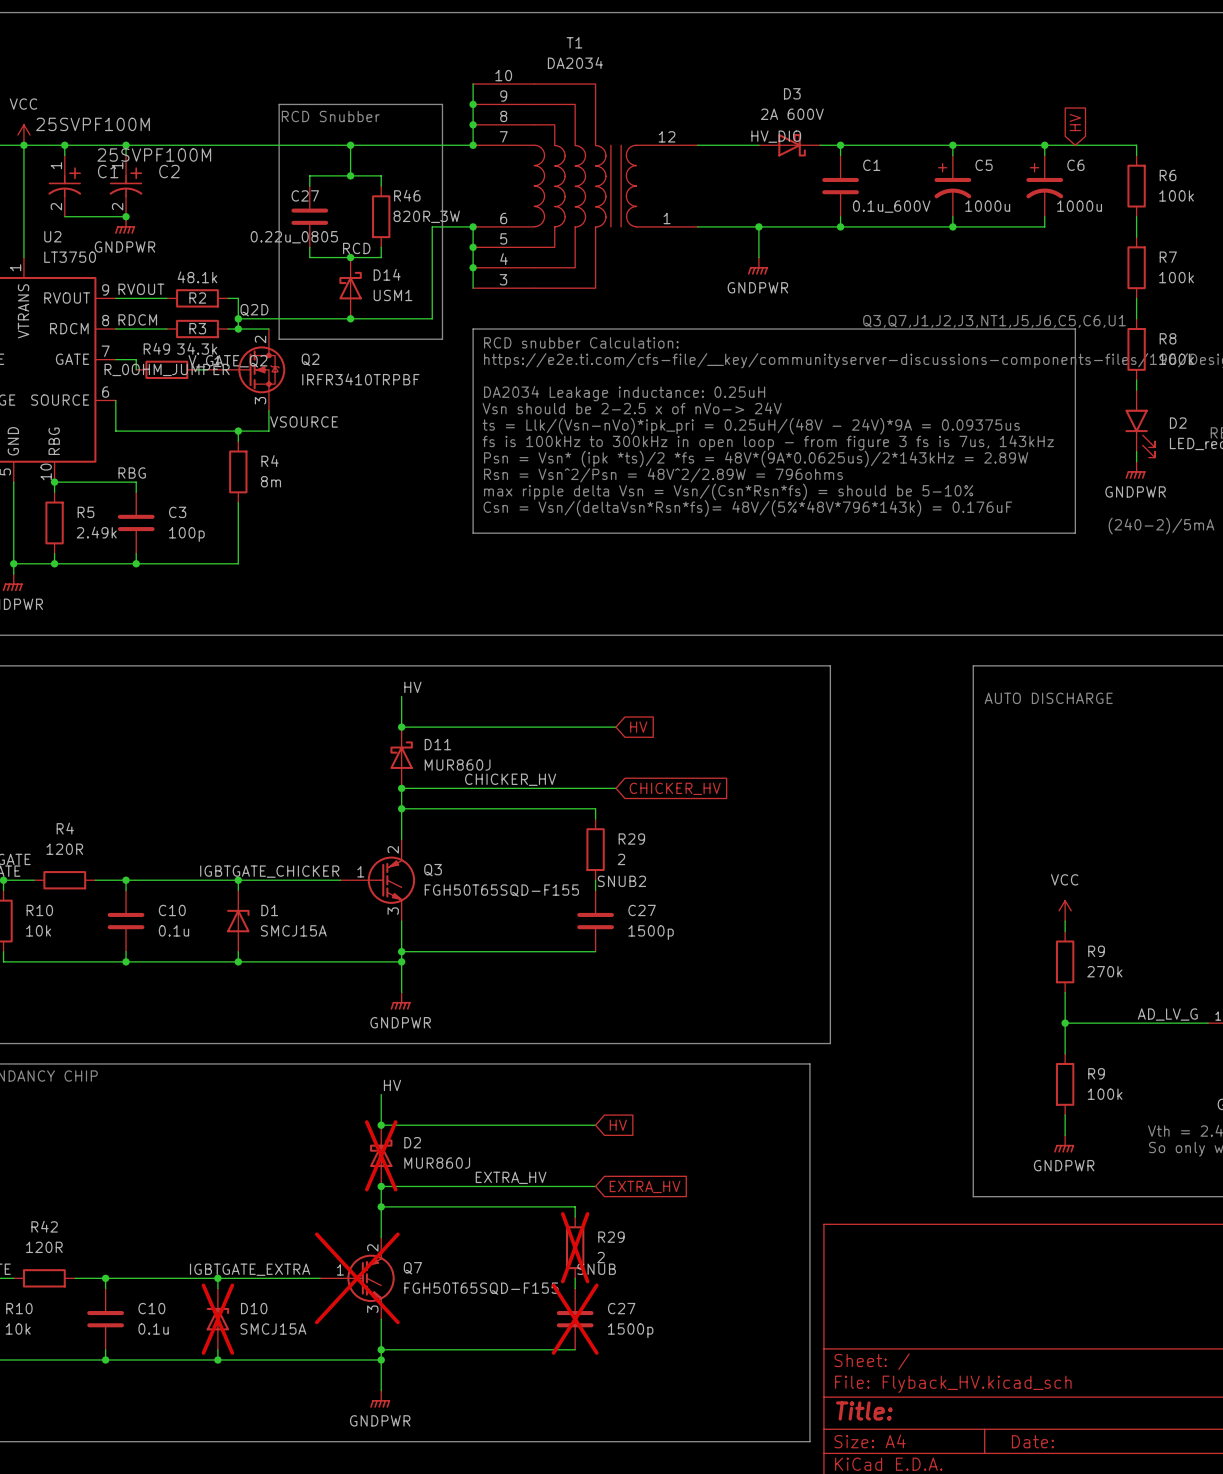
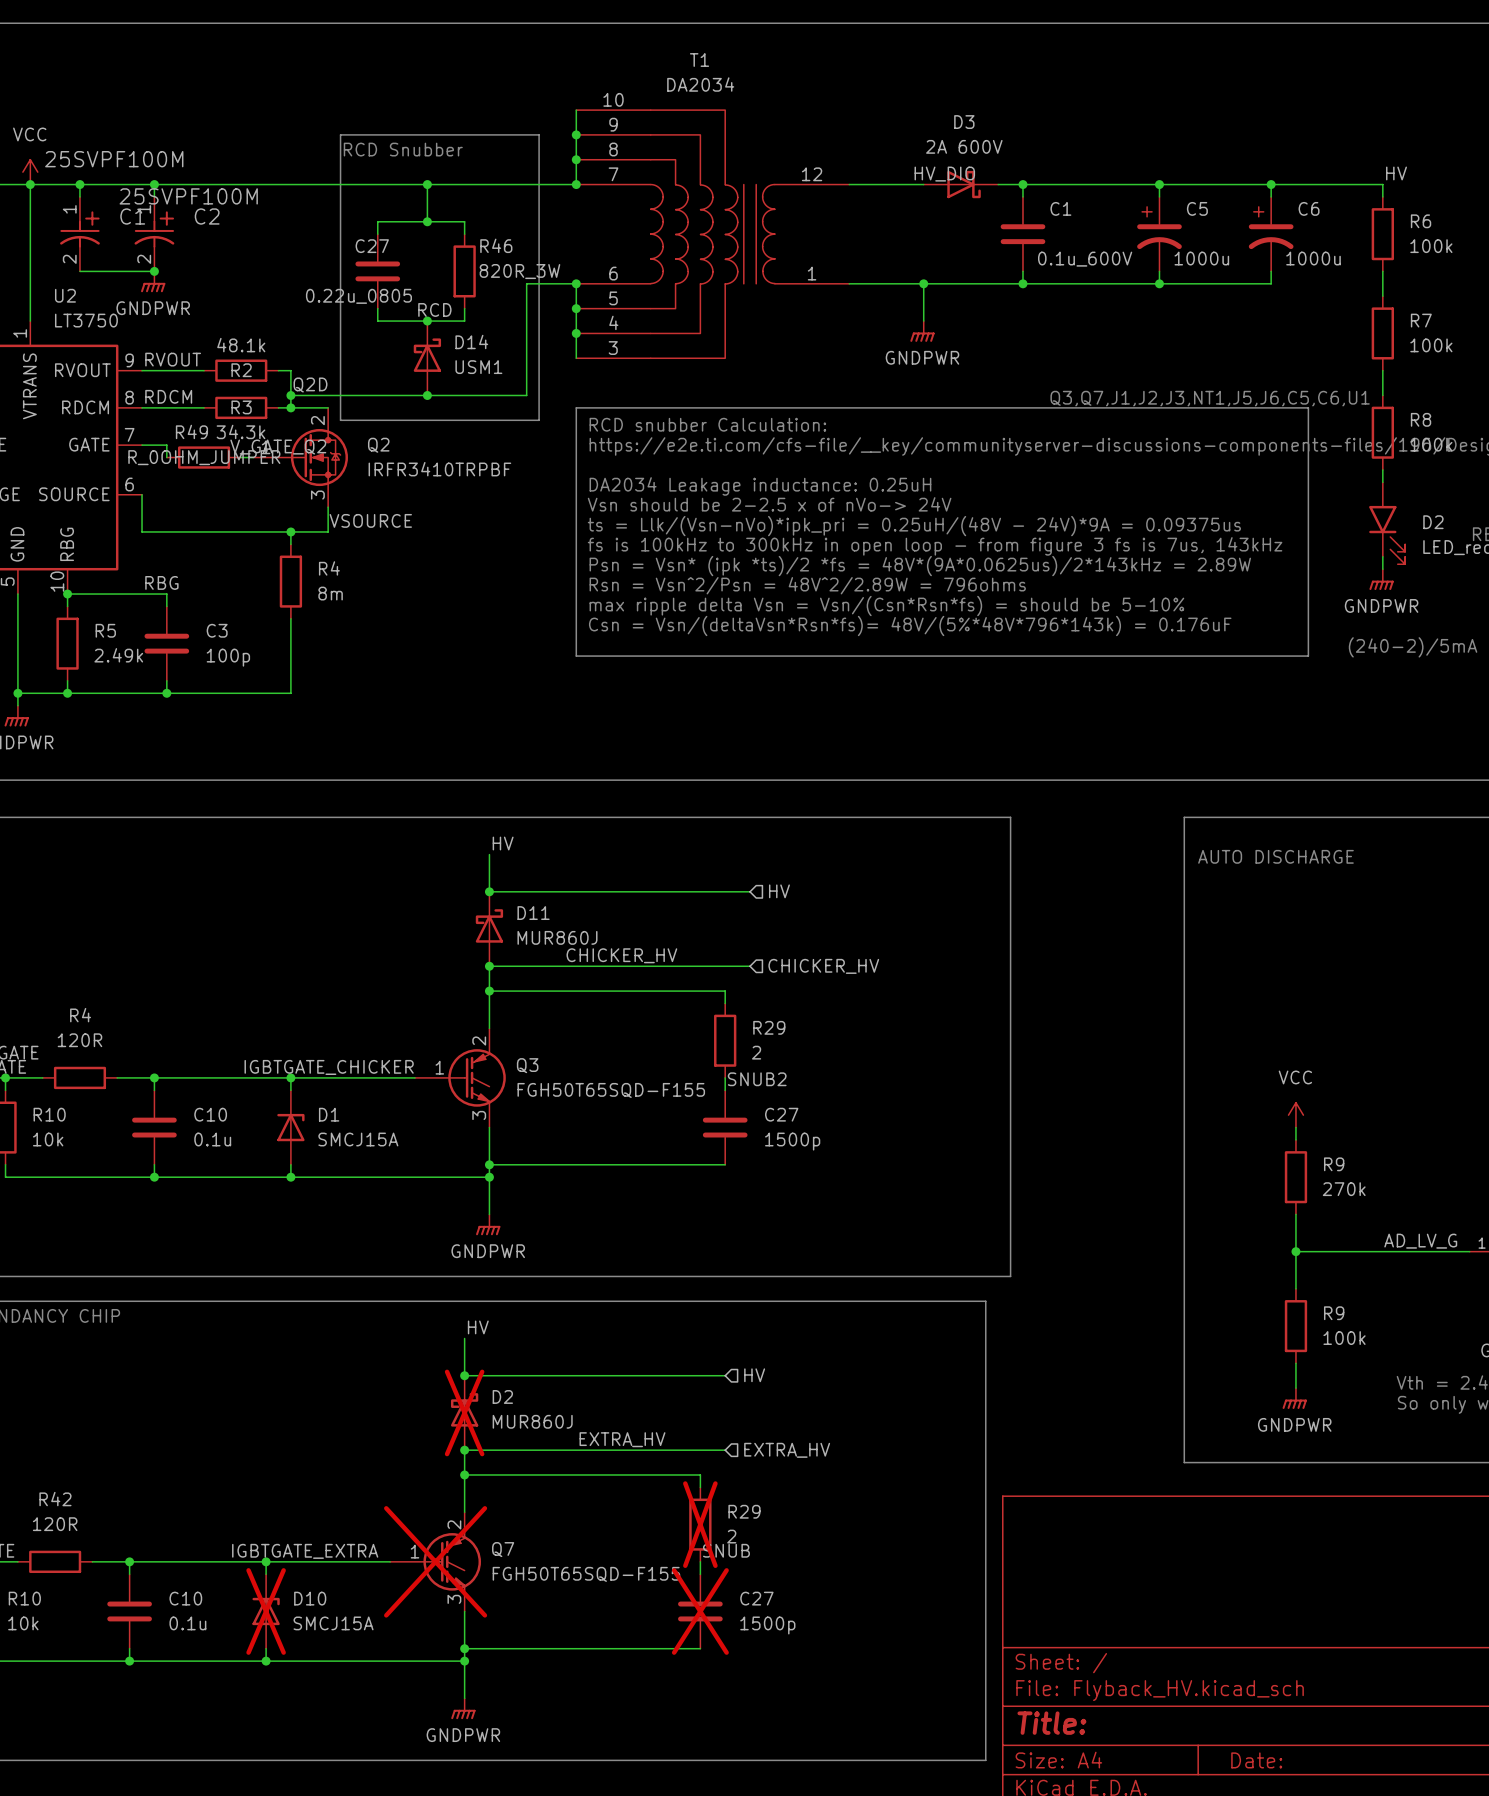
global label: HV (1075, 122) -> none
label: none -> HV (1396, 173)
hierarchical label: none -> HV (779, 891)
global label: HV (638, 727) -> none
global label: CHICKER_HV (675, 788) -> none
hierarchical label: none -> CHICKER_HV (823, 966)
hierarchical label: none -> HV (754, 1375)
global label: HV (618, 1125) -> none
global label: EXTRA_HV (645, 1186) -> none
hierarchical label: none -> EXTRA_HV (787, 1450)

